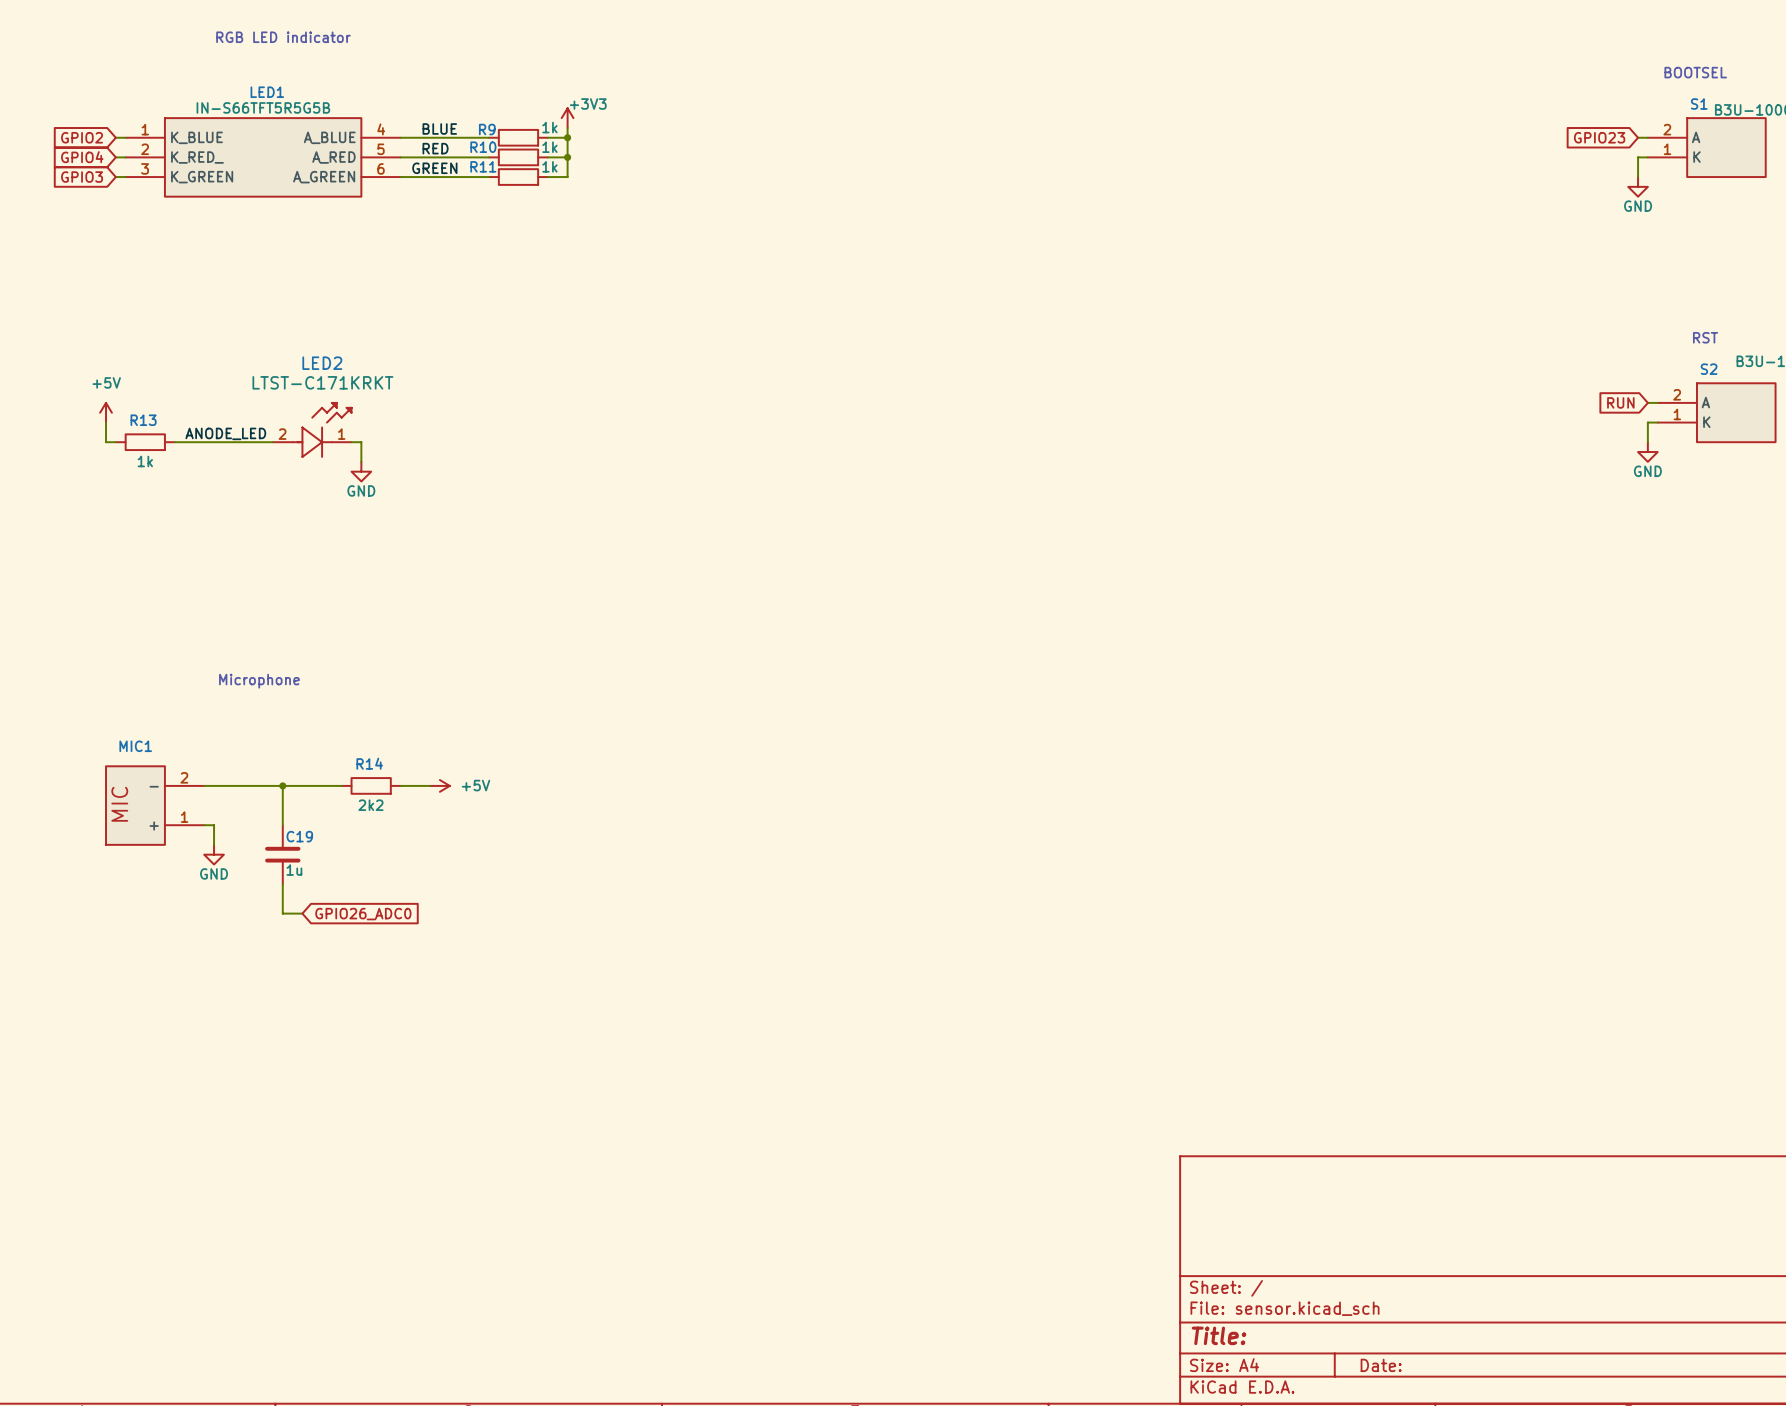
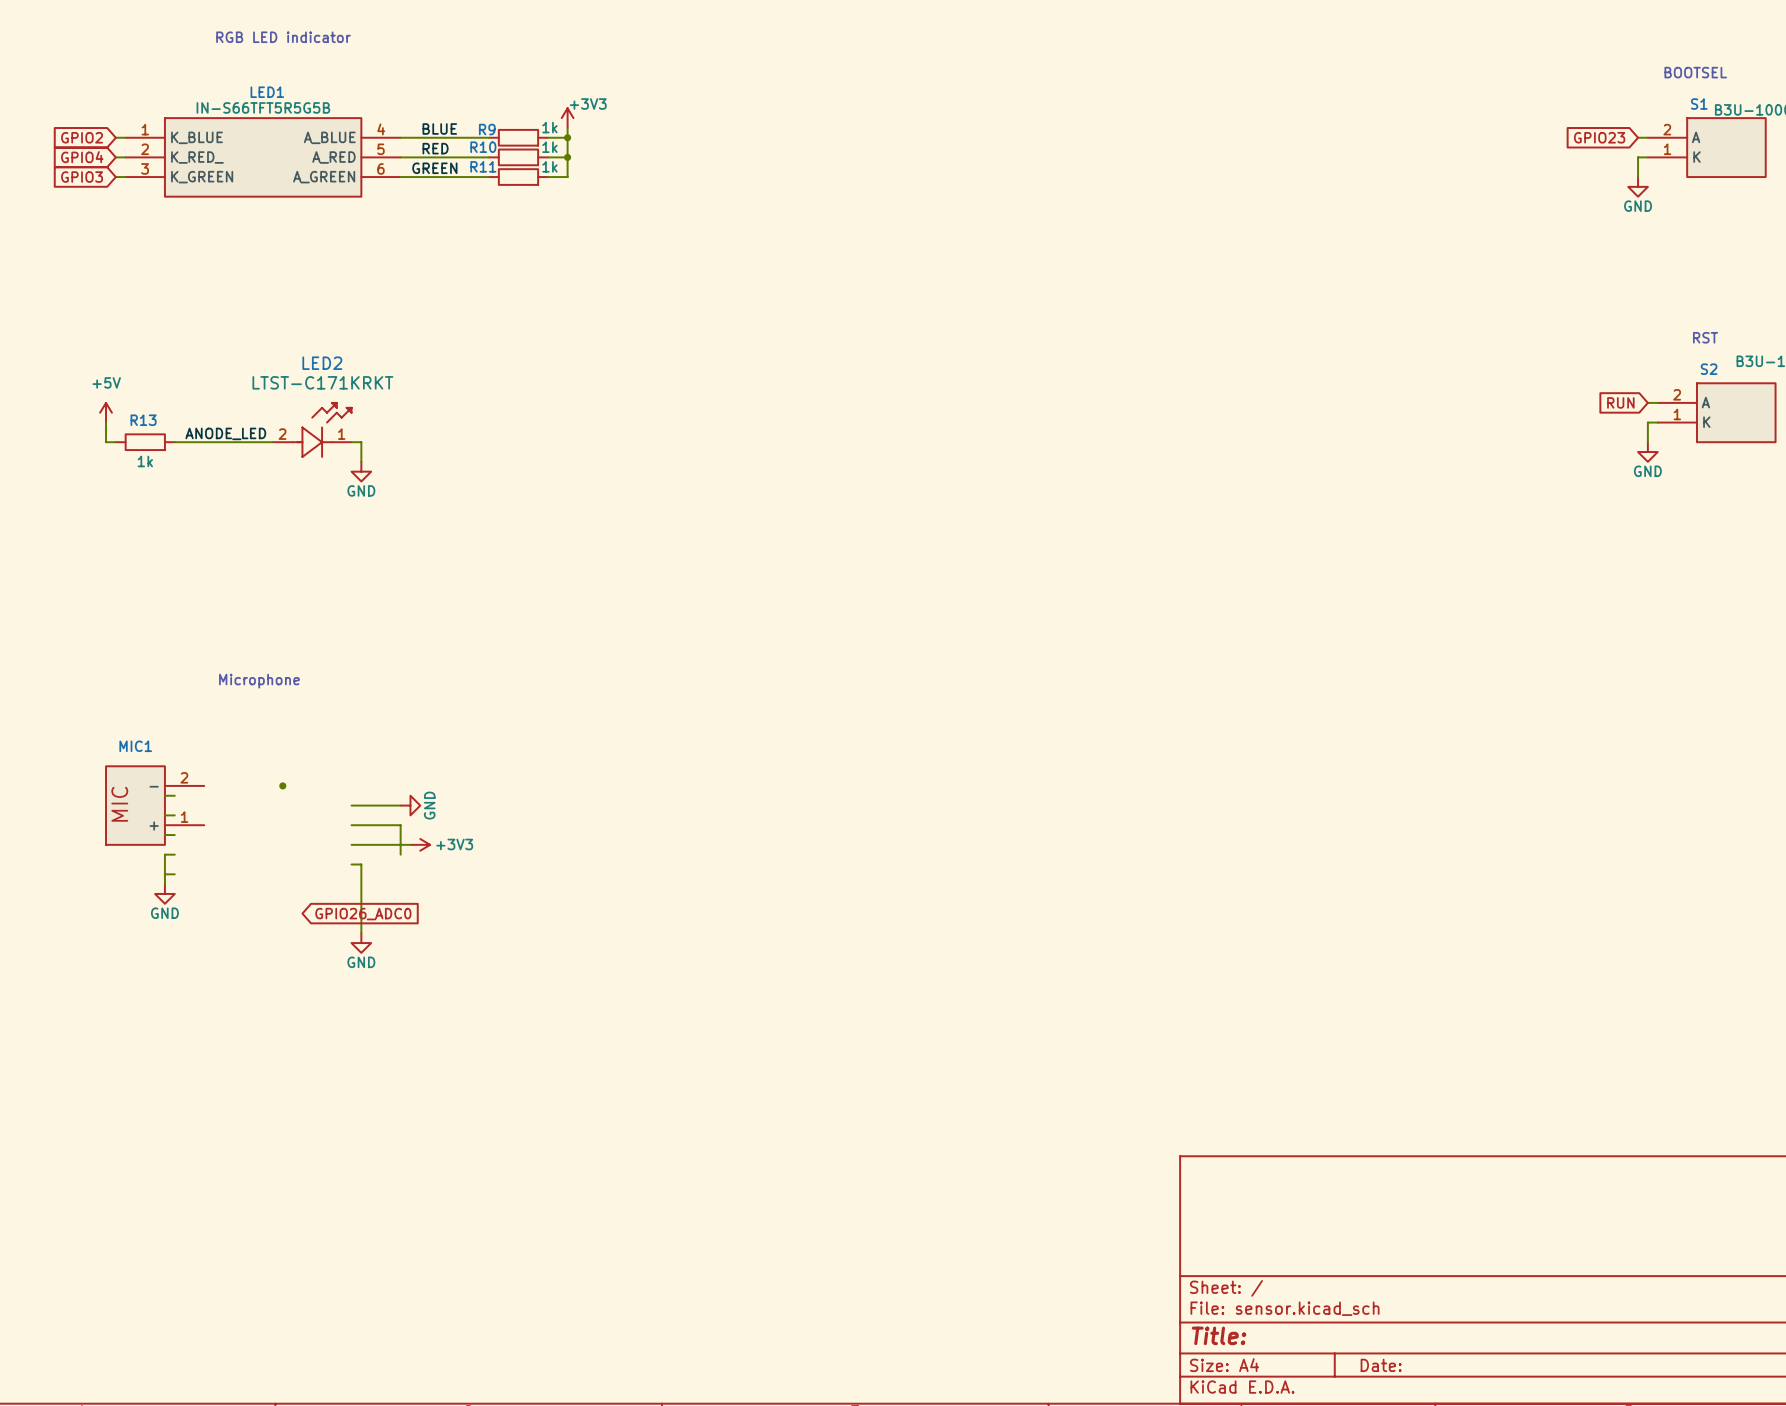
wire: (204, 785) (341, 785) -> none
wire: (282, 785) (282, 825) -> none
R14: 2k2 (371, 785) -> none
wire: (400, 785) (430, 785) -> none
power symbol: +5V (439, 785) -> none
wire: none -> (164, 795) (174, 795)
wire: none -> (351, 805) (400, 805)
power symbol: none -> GND (410, 805)
wire: none -> (164, 815) (174, 815)
wire: (204, 825) (214, 825) (214, 844) -> none
wire: none -> (351, 825) (400, 825) (400, 854)
wire: none -> (164, 835) (174, 835)
wire: none -> (351, 844) (410, 844)
power symbol: none -> +3V3 (420, 844)
wire: none -> (174, 854) (164, 854) (164, 884)
power symbol position: GND (214, 854) -> GND (164, 893)
C19: 1u (282, 854) -> none
wire: none -> (351, 864) (361, 864) (361, 933)
wire: none -> (164, 874) (174, 874)
wire: (282, 884) (282, 913) (302, 913) -> none
power symbol: none -> GND (361, 943)

